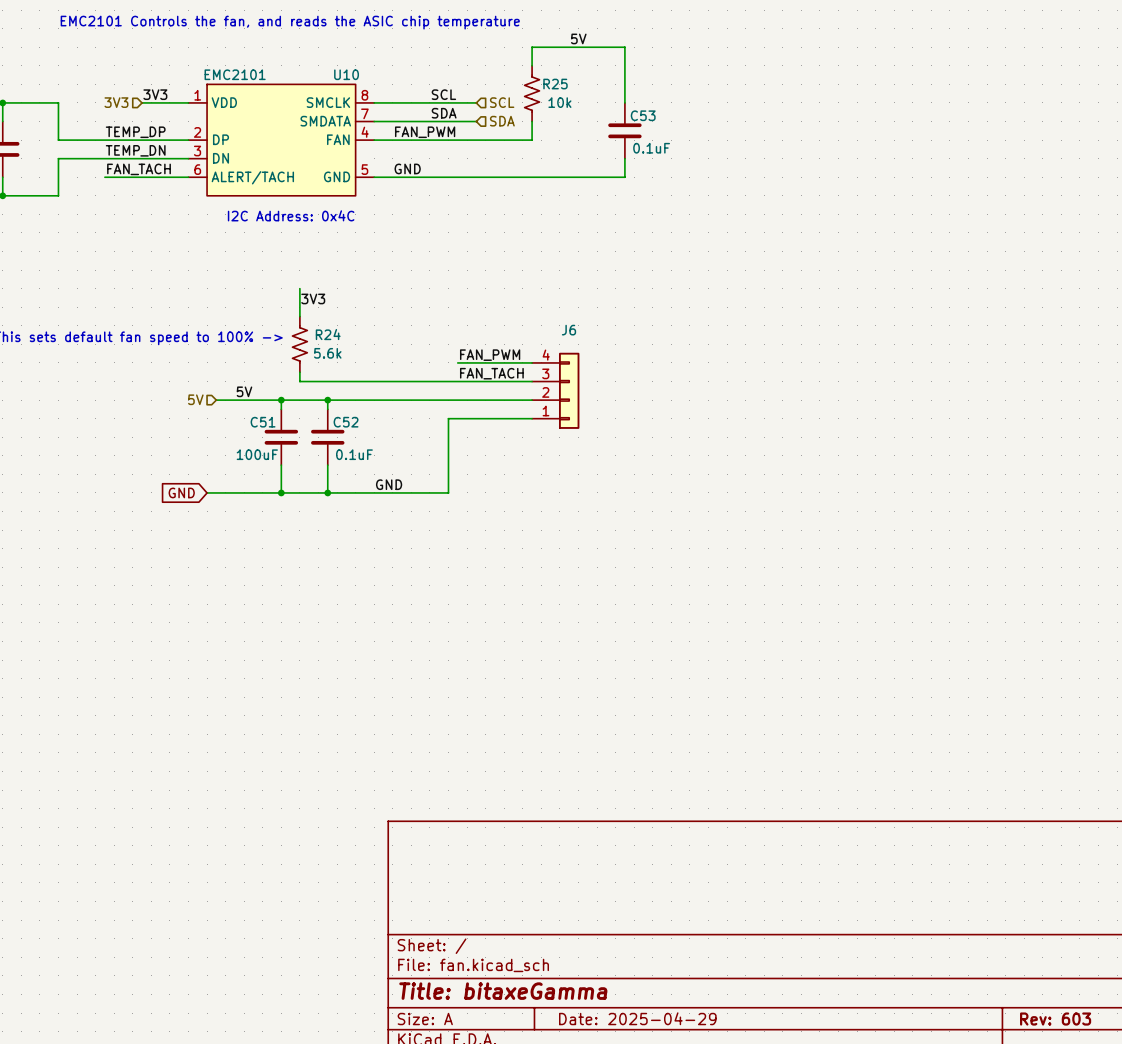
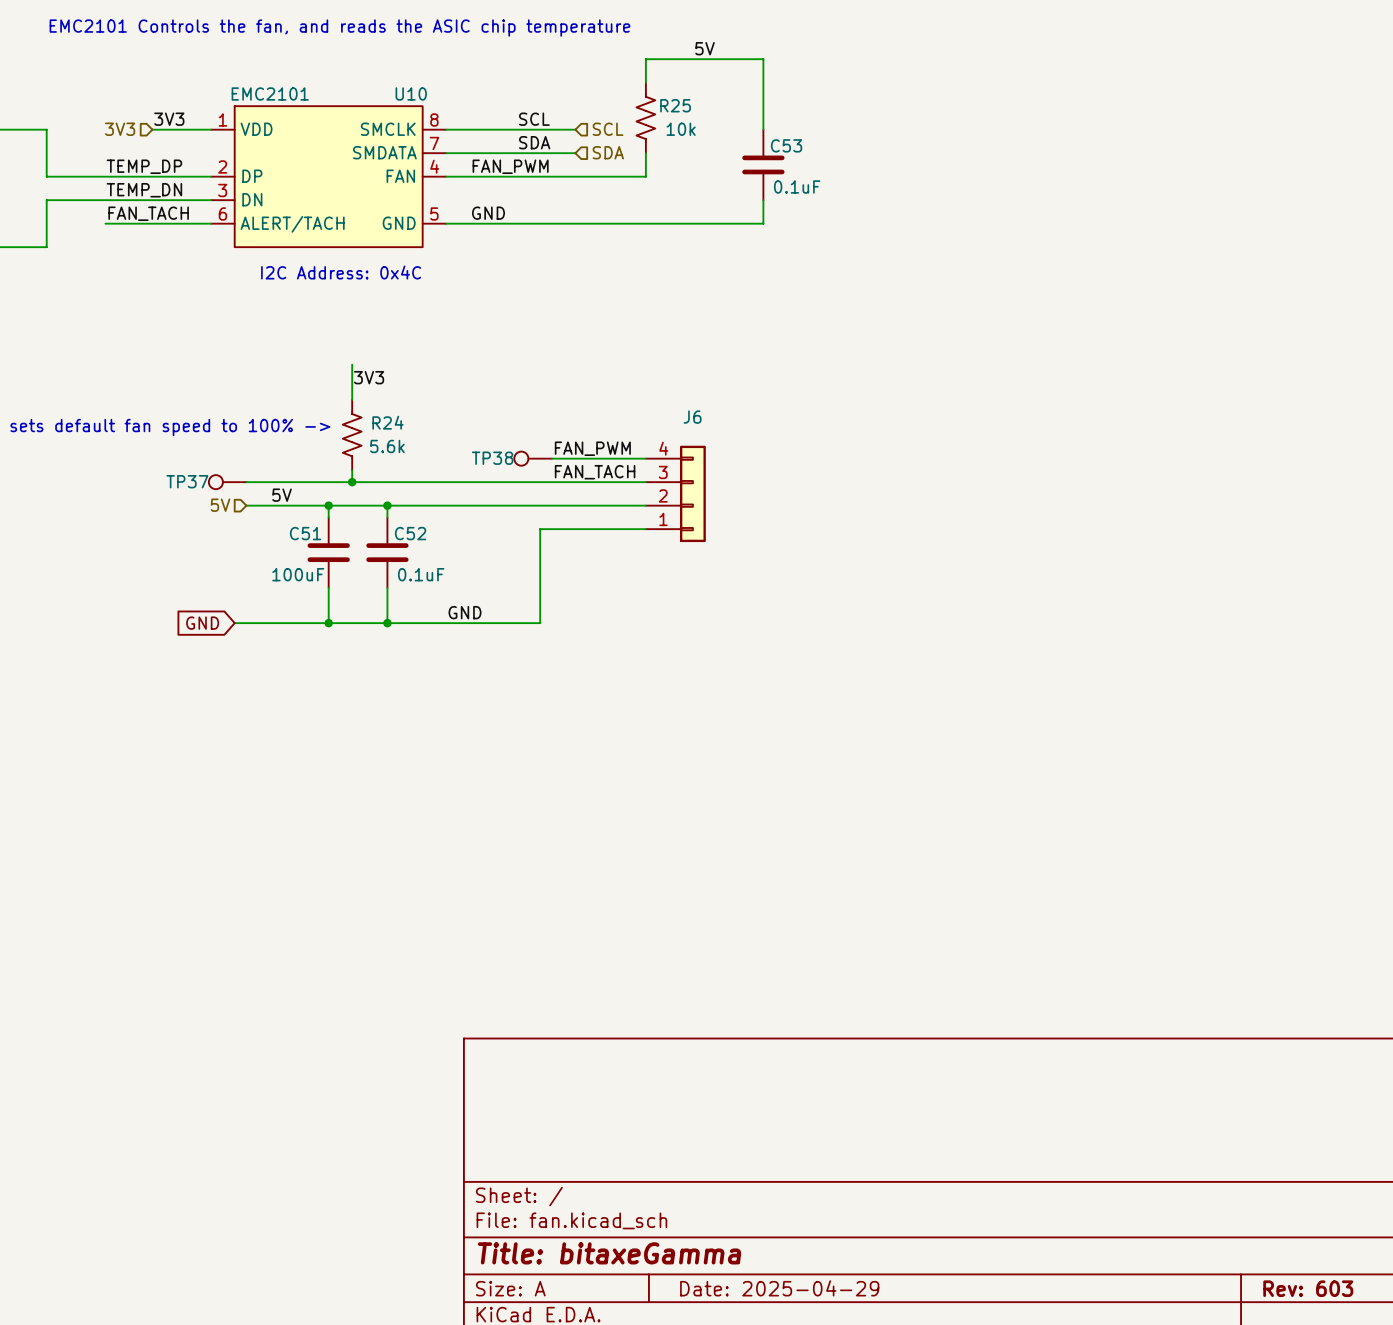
TP38: none -> (533, 458)
TP37: none -> (227, 482)
wire: none -> (246, 482) (352, 482)
junction: none -> (352, 482)

